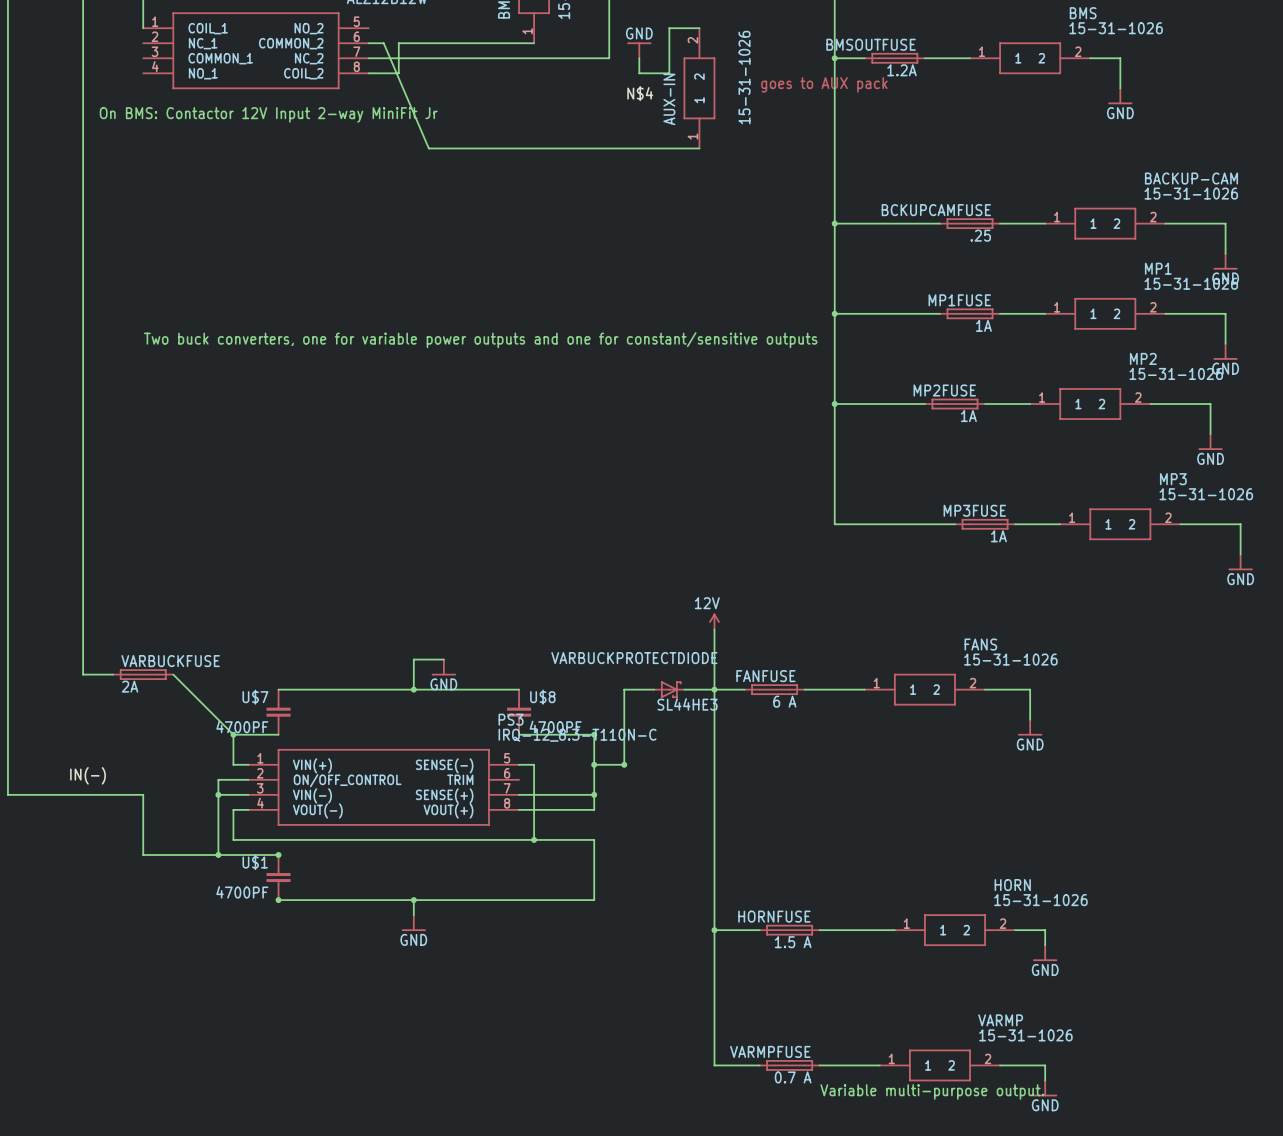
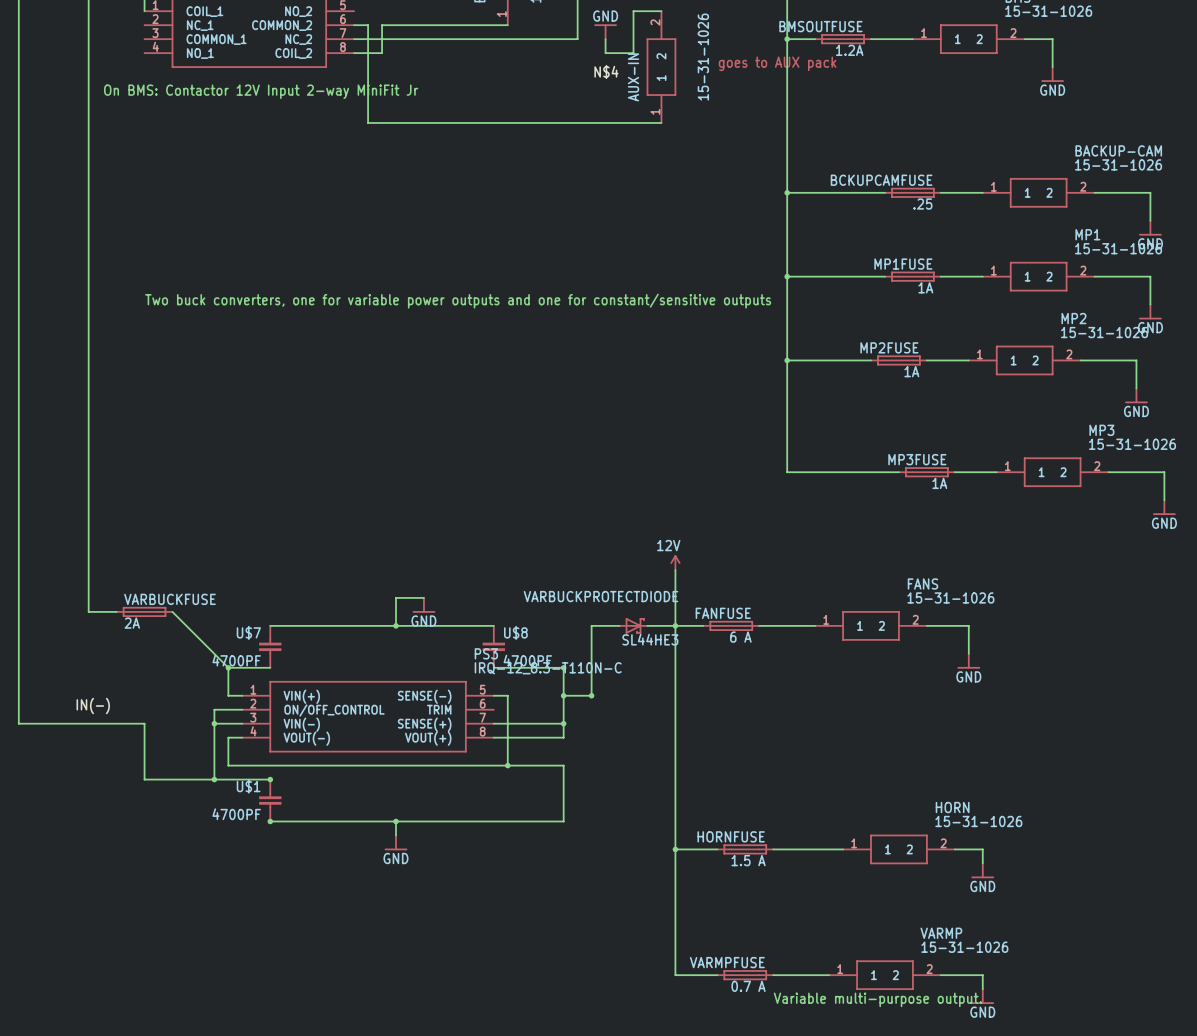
wire: (383, 43) (428, 148) -> (368, 25) (368, 122) (409, 122)

